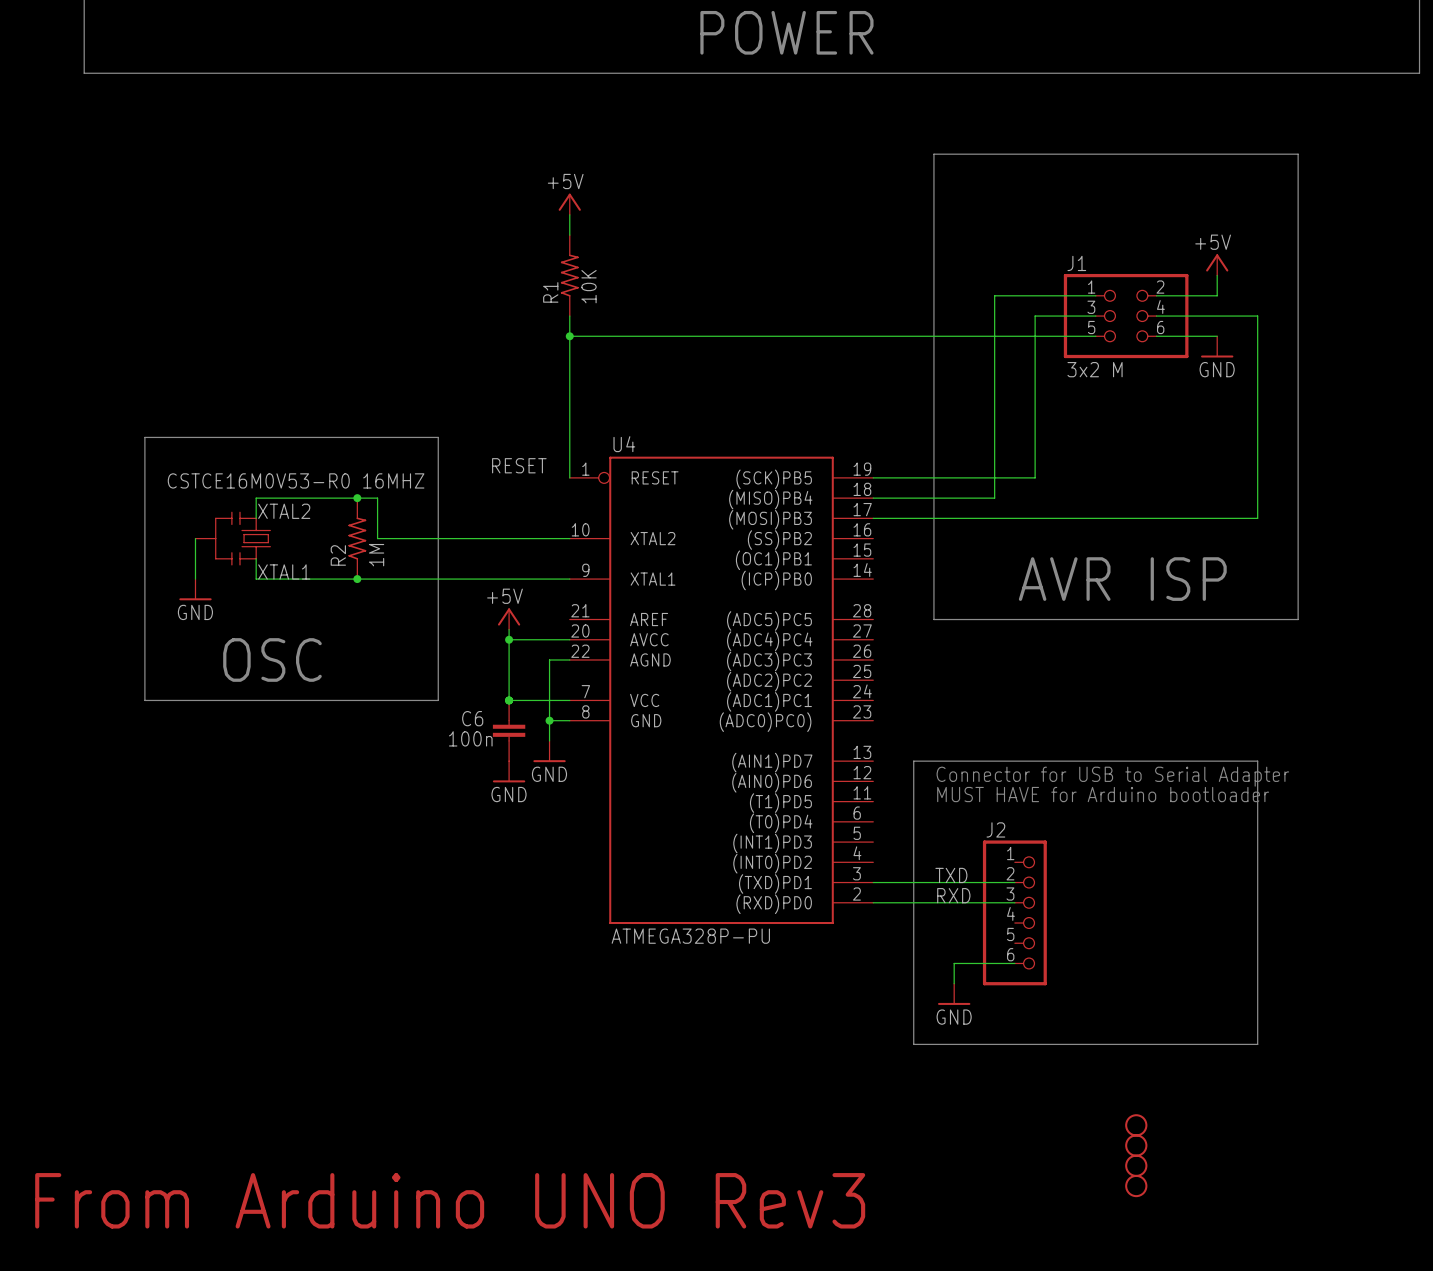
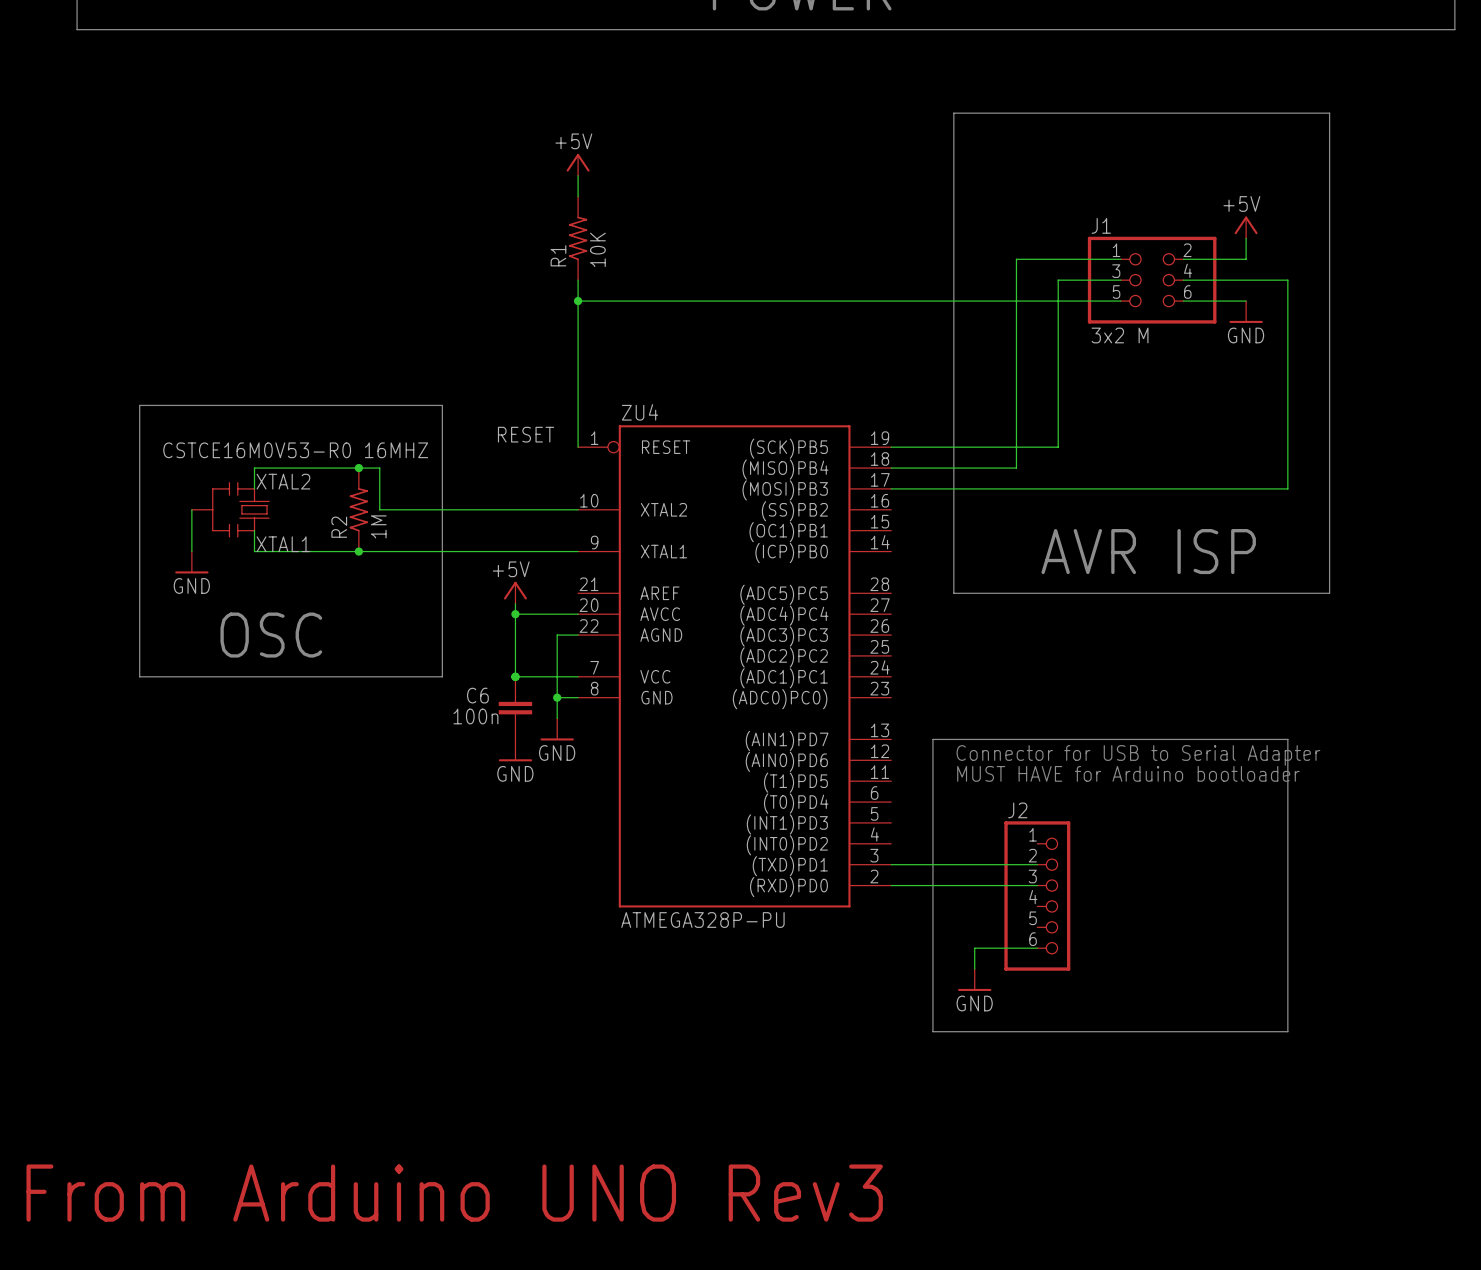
U4 name: U4 (624, 444) -> ZU4 (640, 412)
label: TXD (951, 875) -> none
label: RXD (953, 895) -> none
part: (1136, 1125) -> none
part: (1136, 1145) -> none
part: (1136, 1165) -> none
part: (1136, 1186) -> none

